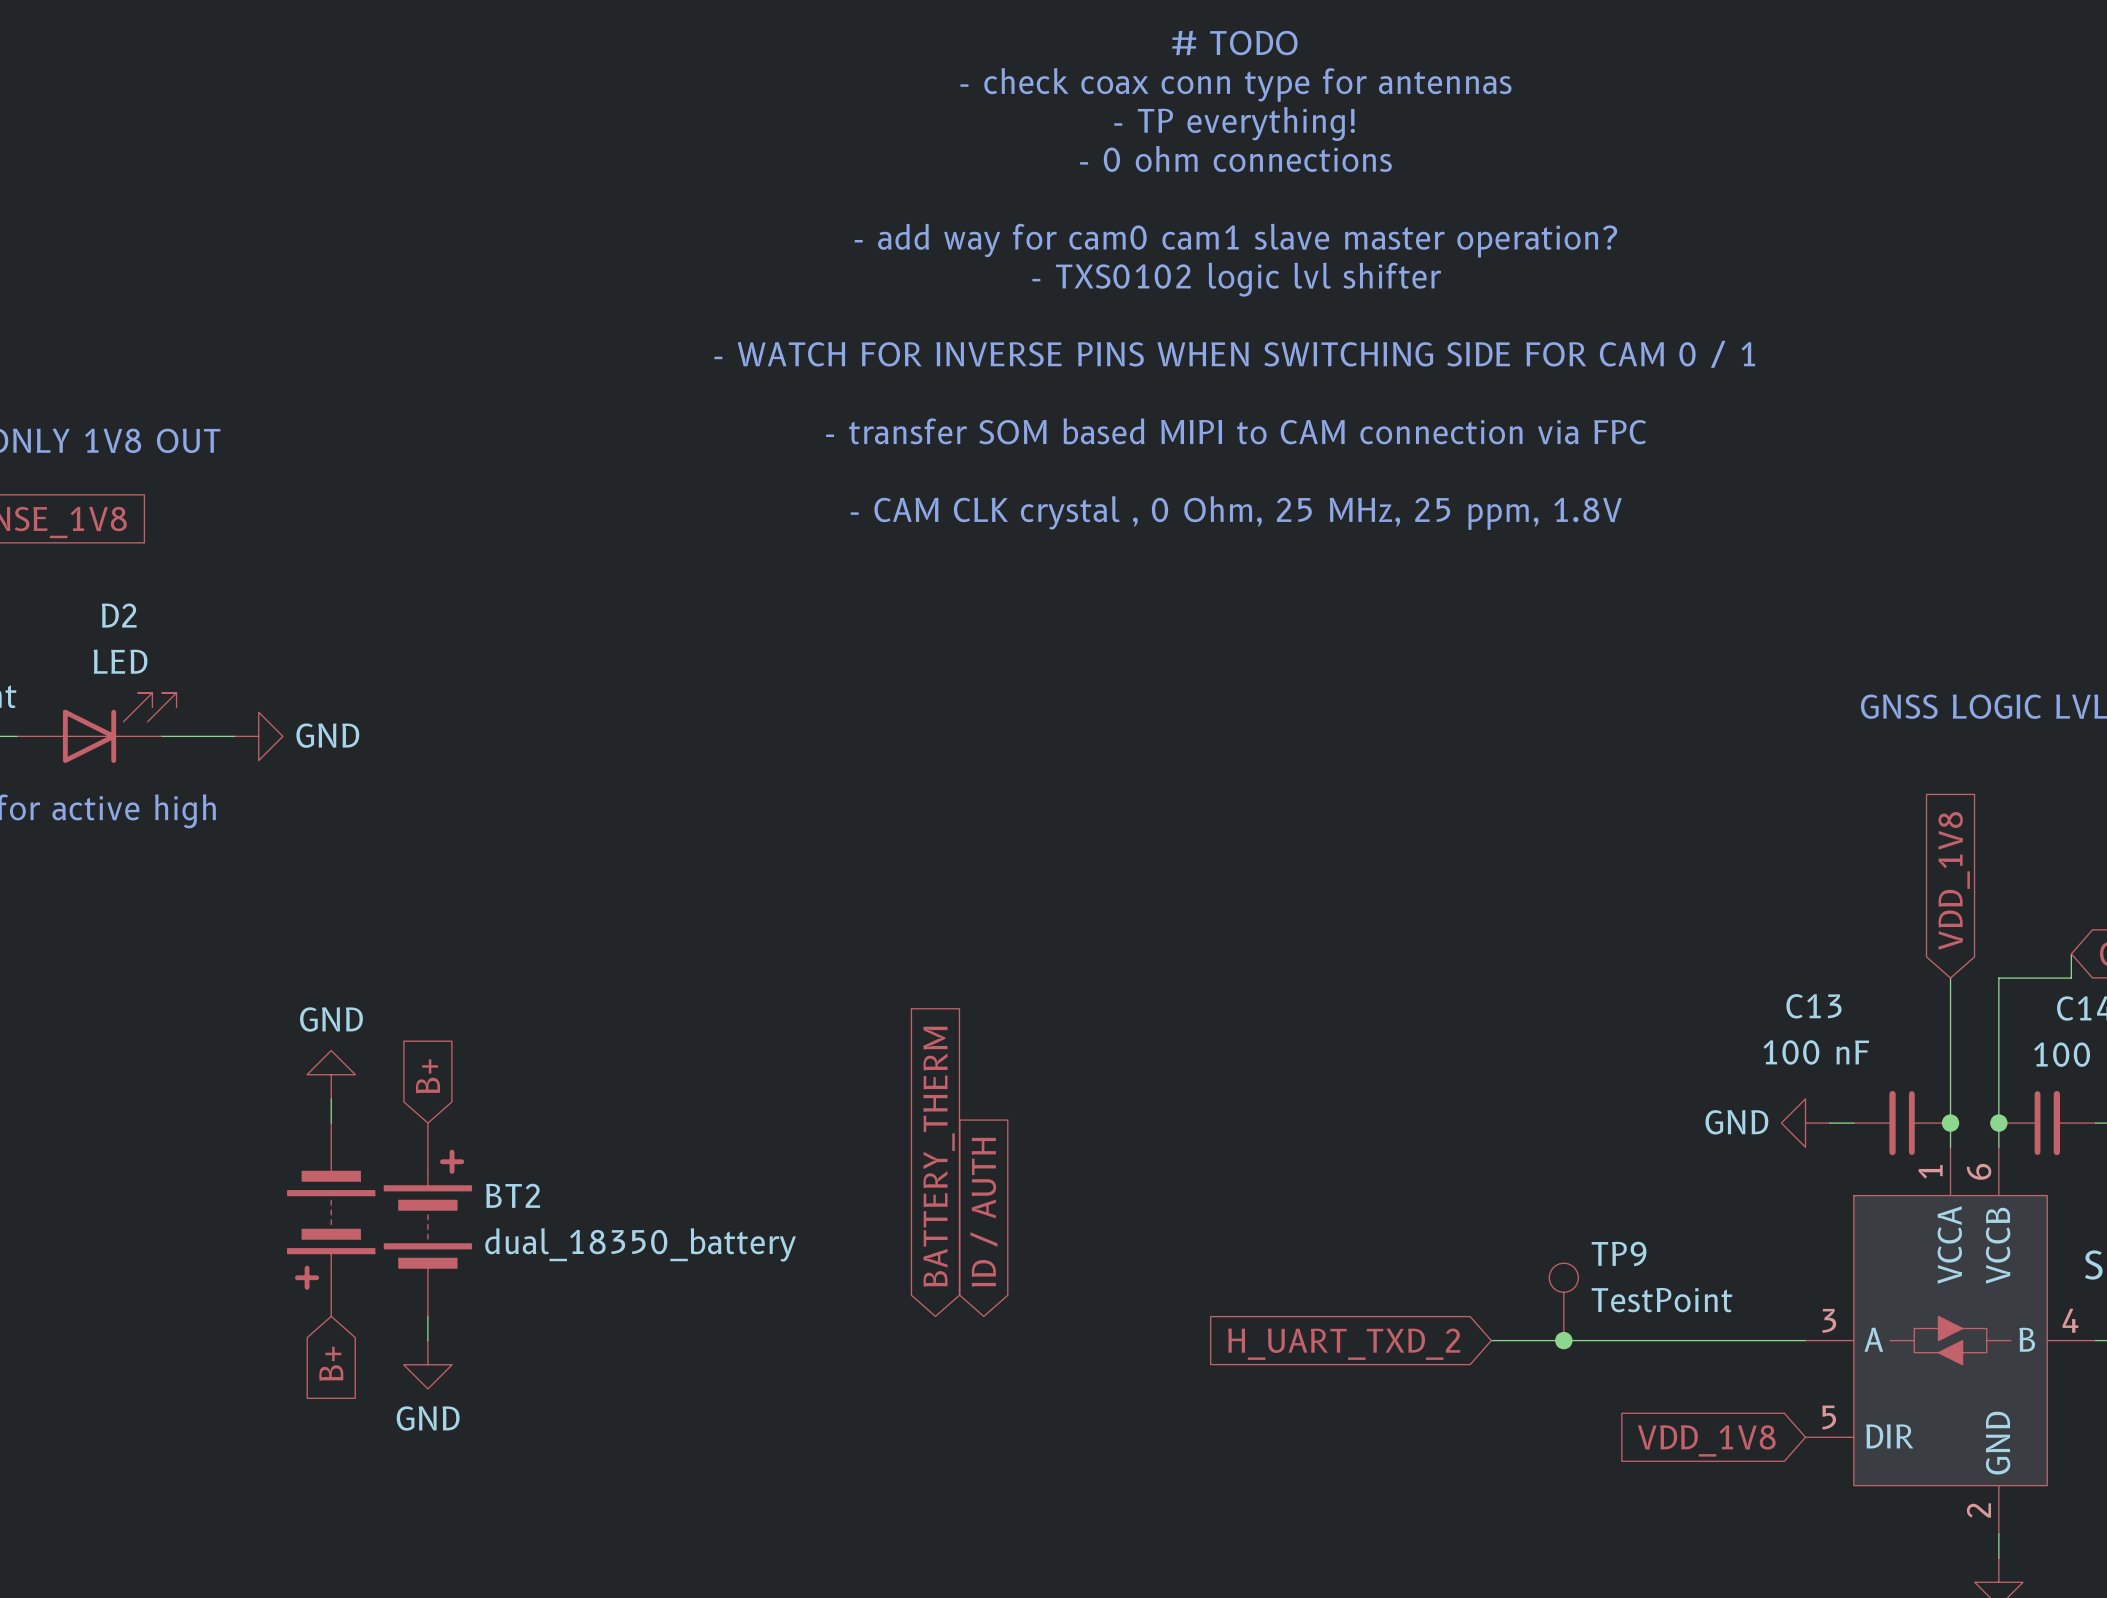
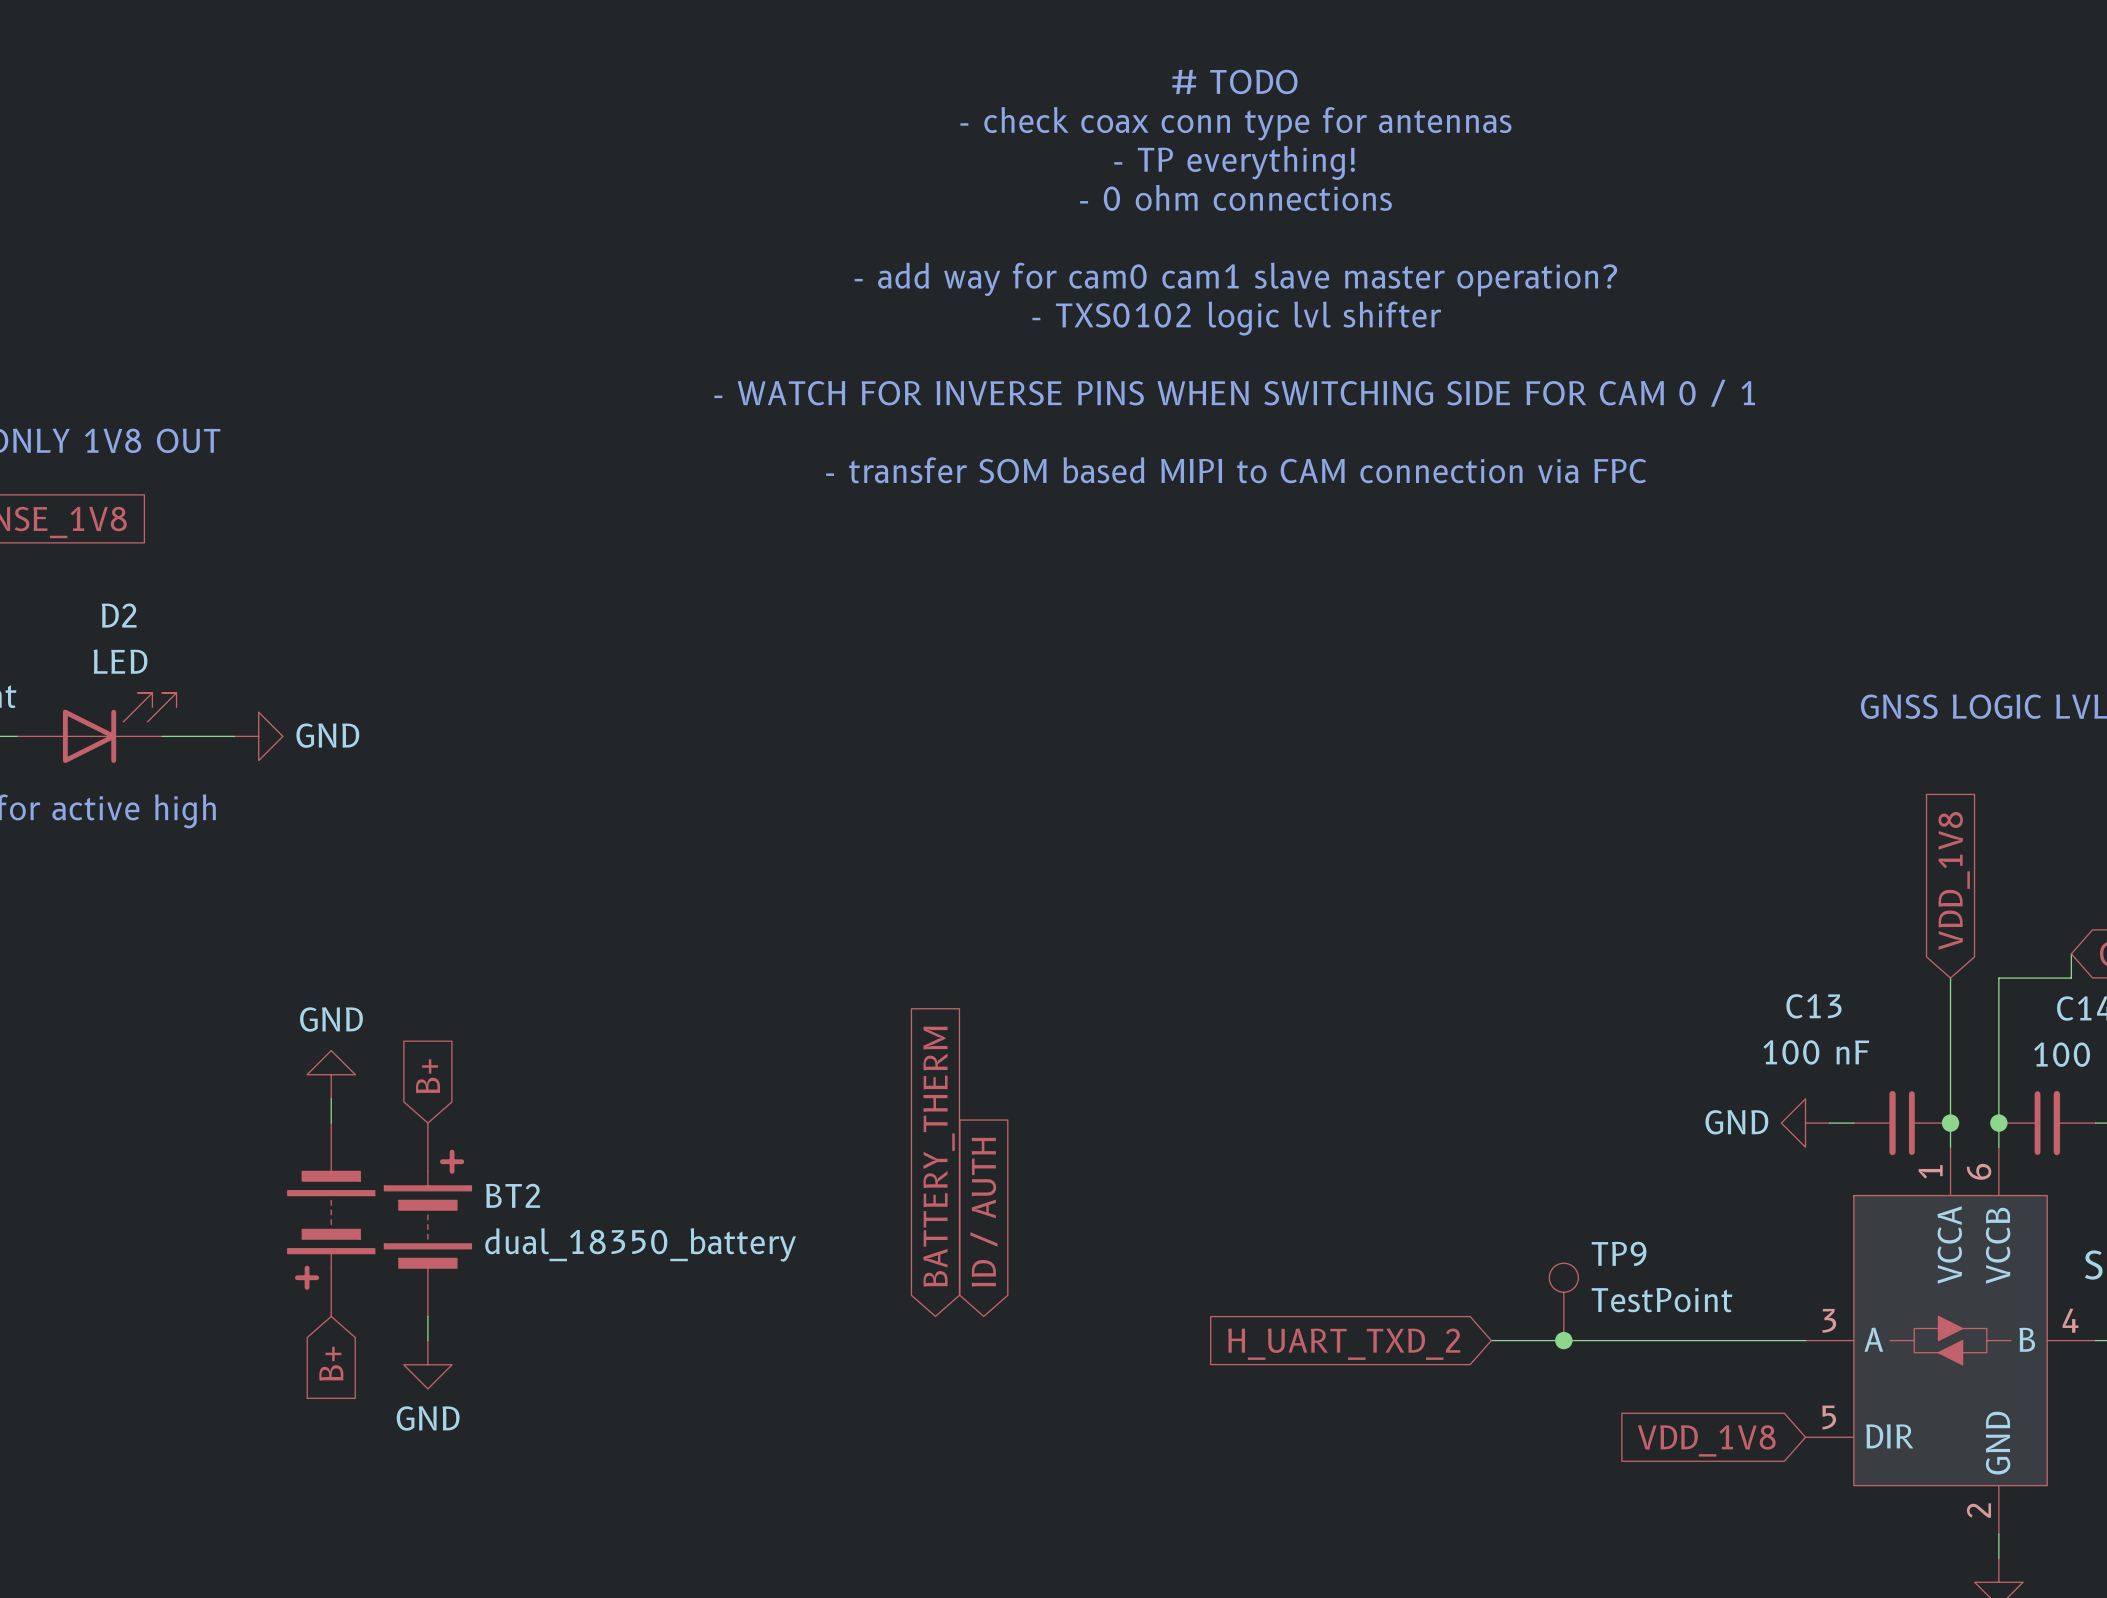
text: # TODO (1234, 43) -> none
text: - check coax conn type for antennas (1235, 84) -> # TODO (1234, 81)
text: - TP everything! (1234, 124) -> - check coax conn type for antennas (1235, 123)
text: - 0 ohm connections (1235, 158) -> - TP everything! (1234, 162)
text: none -> - 0 ohm connections (1235, 197)
text: - add way for cam0 cam1 slave master operation? (1235, 240) -> none
text: - TXS0102 logic lvl shifter (1236, 279) -> - add way for cam0 cam1 slave master operation? (1235, 279)
text: none -> - TXS0102 logic lvl shifter (1236, 318)
text position: - WATCH FOR INVERSE PINS WHEN SWITCHING SIDE FOR CAM 0 / 1 (1234, 354) -> - WATCH FOR INVERSE PINS WHEN SWITCHING SIDE FOR CAM 0 / 1 (1234, 393)
text position: - transfer SOM based MIPI to CAM connection via FPC (1236, 431) -> - transfer SOM based MIPI to CAM connection via FPC (1236, 470)
text: - CAM CLK crystal , 0 Ohm, 25 MHz, 25 ppm, 1.8V (1236, 513) -> none

